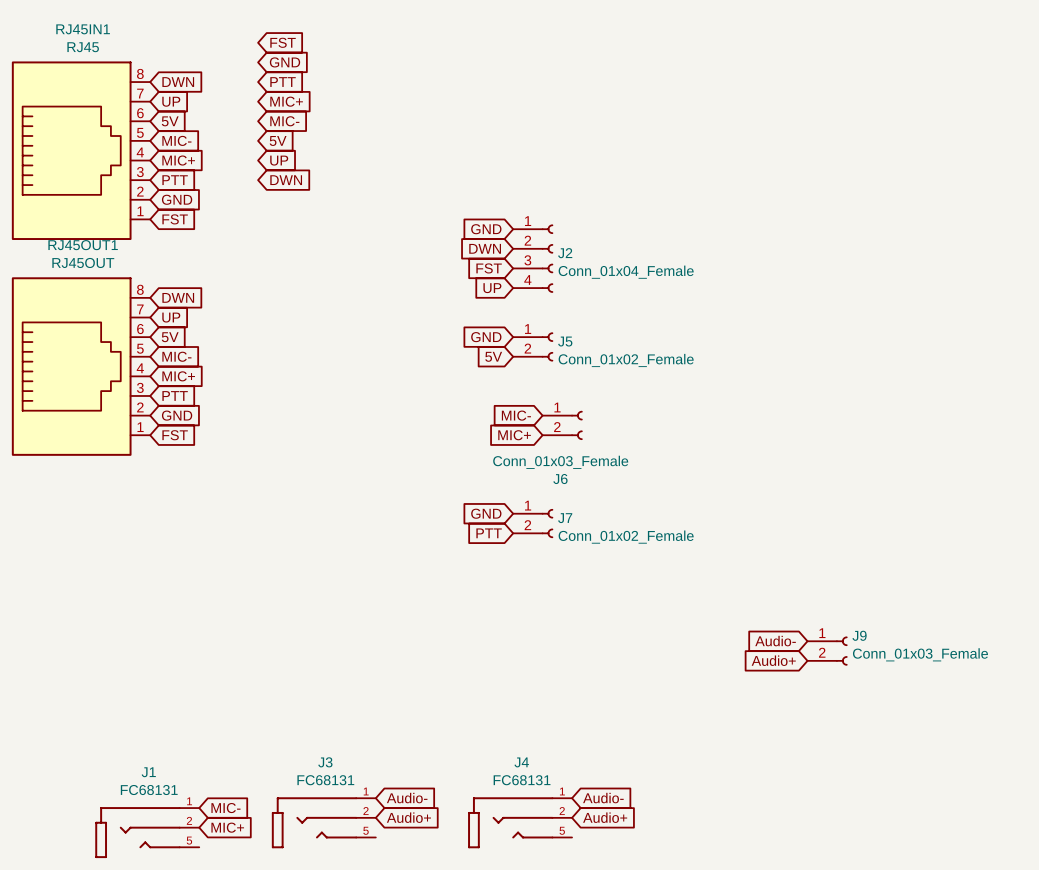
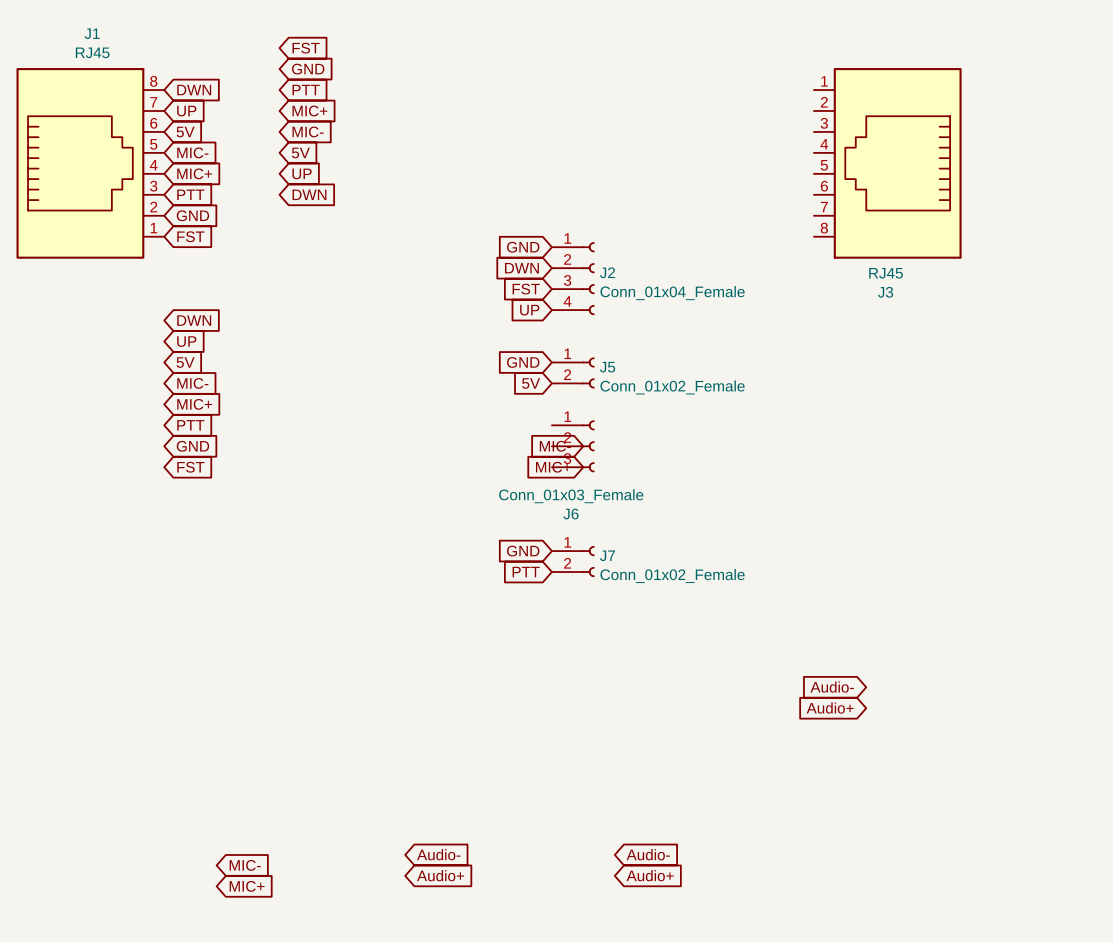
RJ45IN1 name: RJ45IN1 (83, 29) -> J1 (92, 33)
RJ45OUT1: RJ45OUT (81, 366) -> none
J6 symbol: [542, 411, 583, 440] -> [551, 420, 595, 473]
J9: Conn_01x03_Female (827, 651) -> none
J3 name position: J3 (325, 762) -> J3 (885, 292)
J3 value: FC68131 (325, 780) -> RJ45 (886, 273)
J3 symbol: [271, 797, 376, 849] -> [813, 68, 962, 259]
J4: FC68131 (520, 822) -> none
J1: FC68131 (147, 832) -> none

